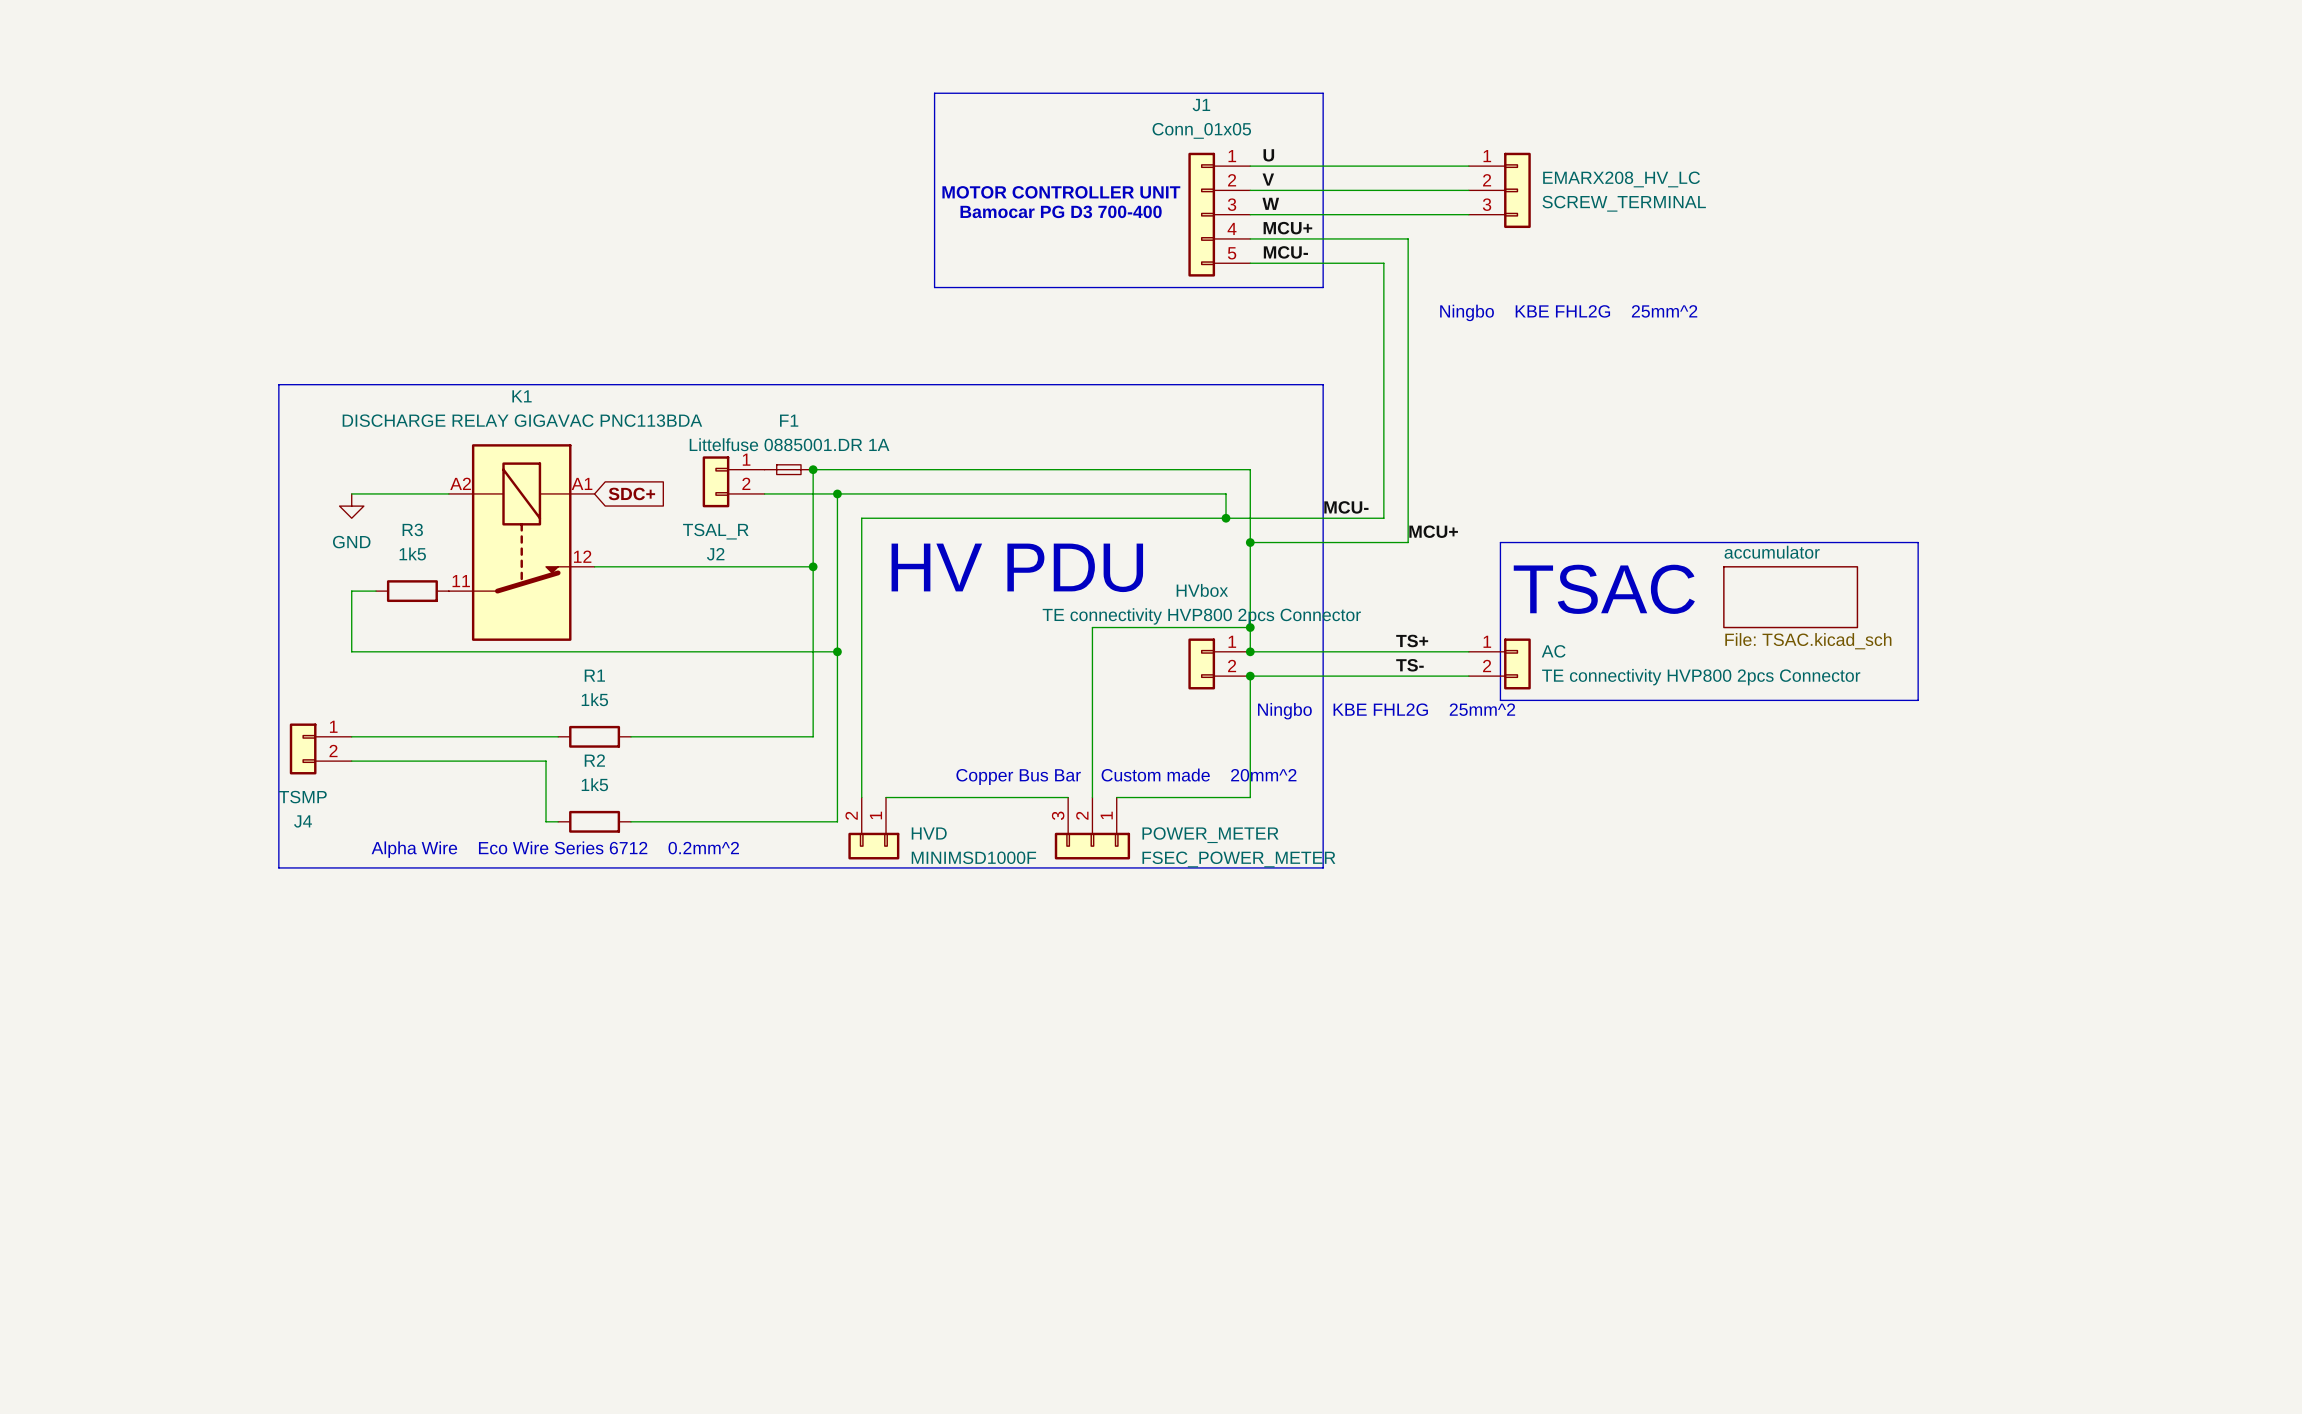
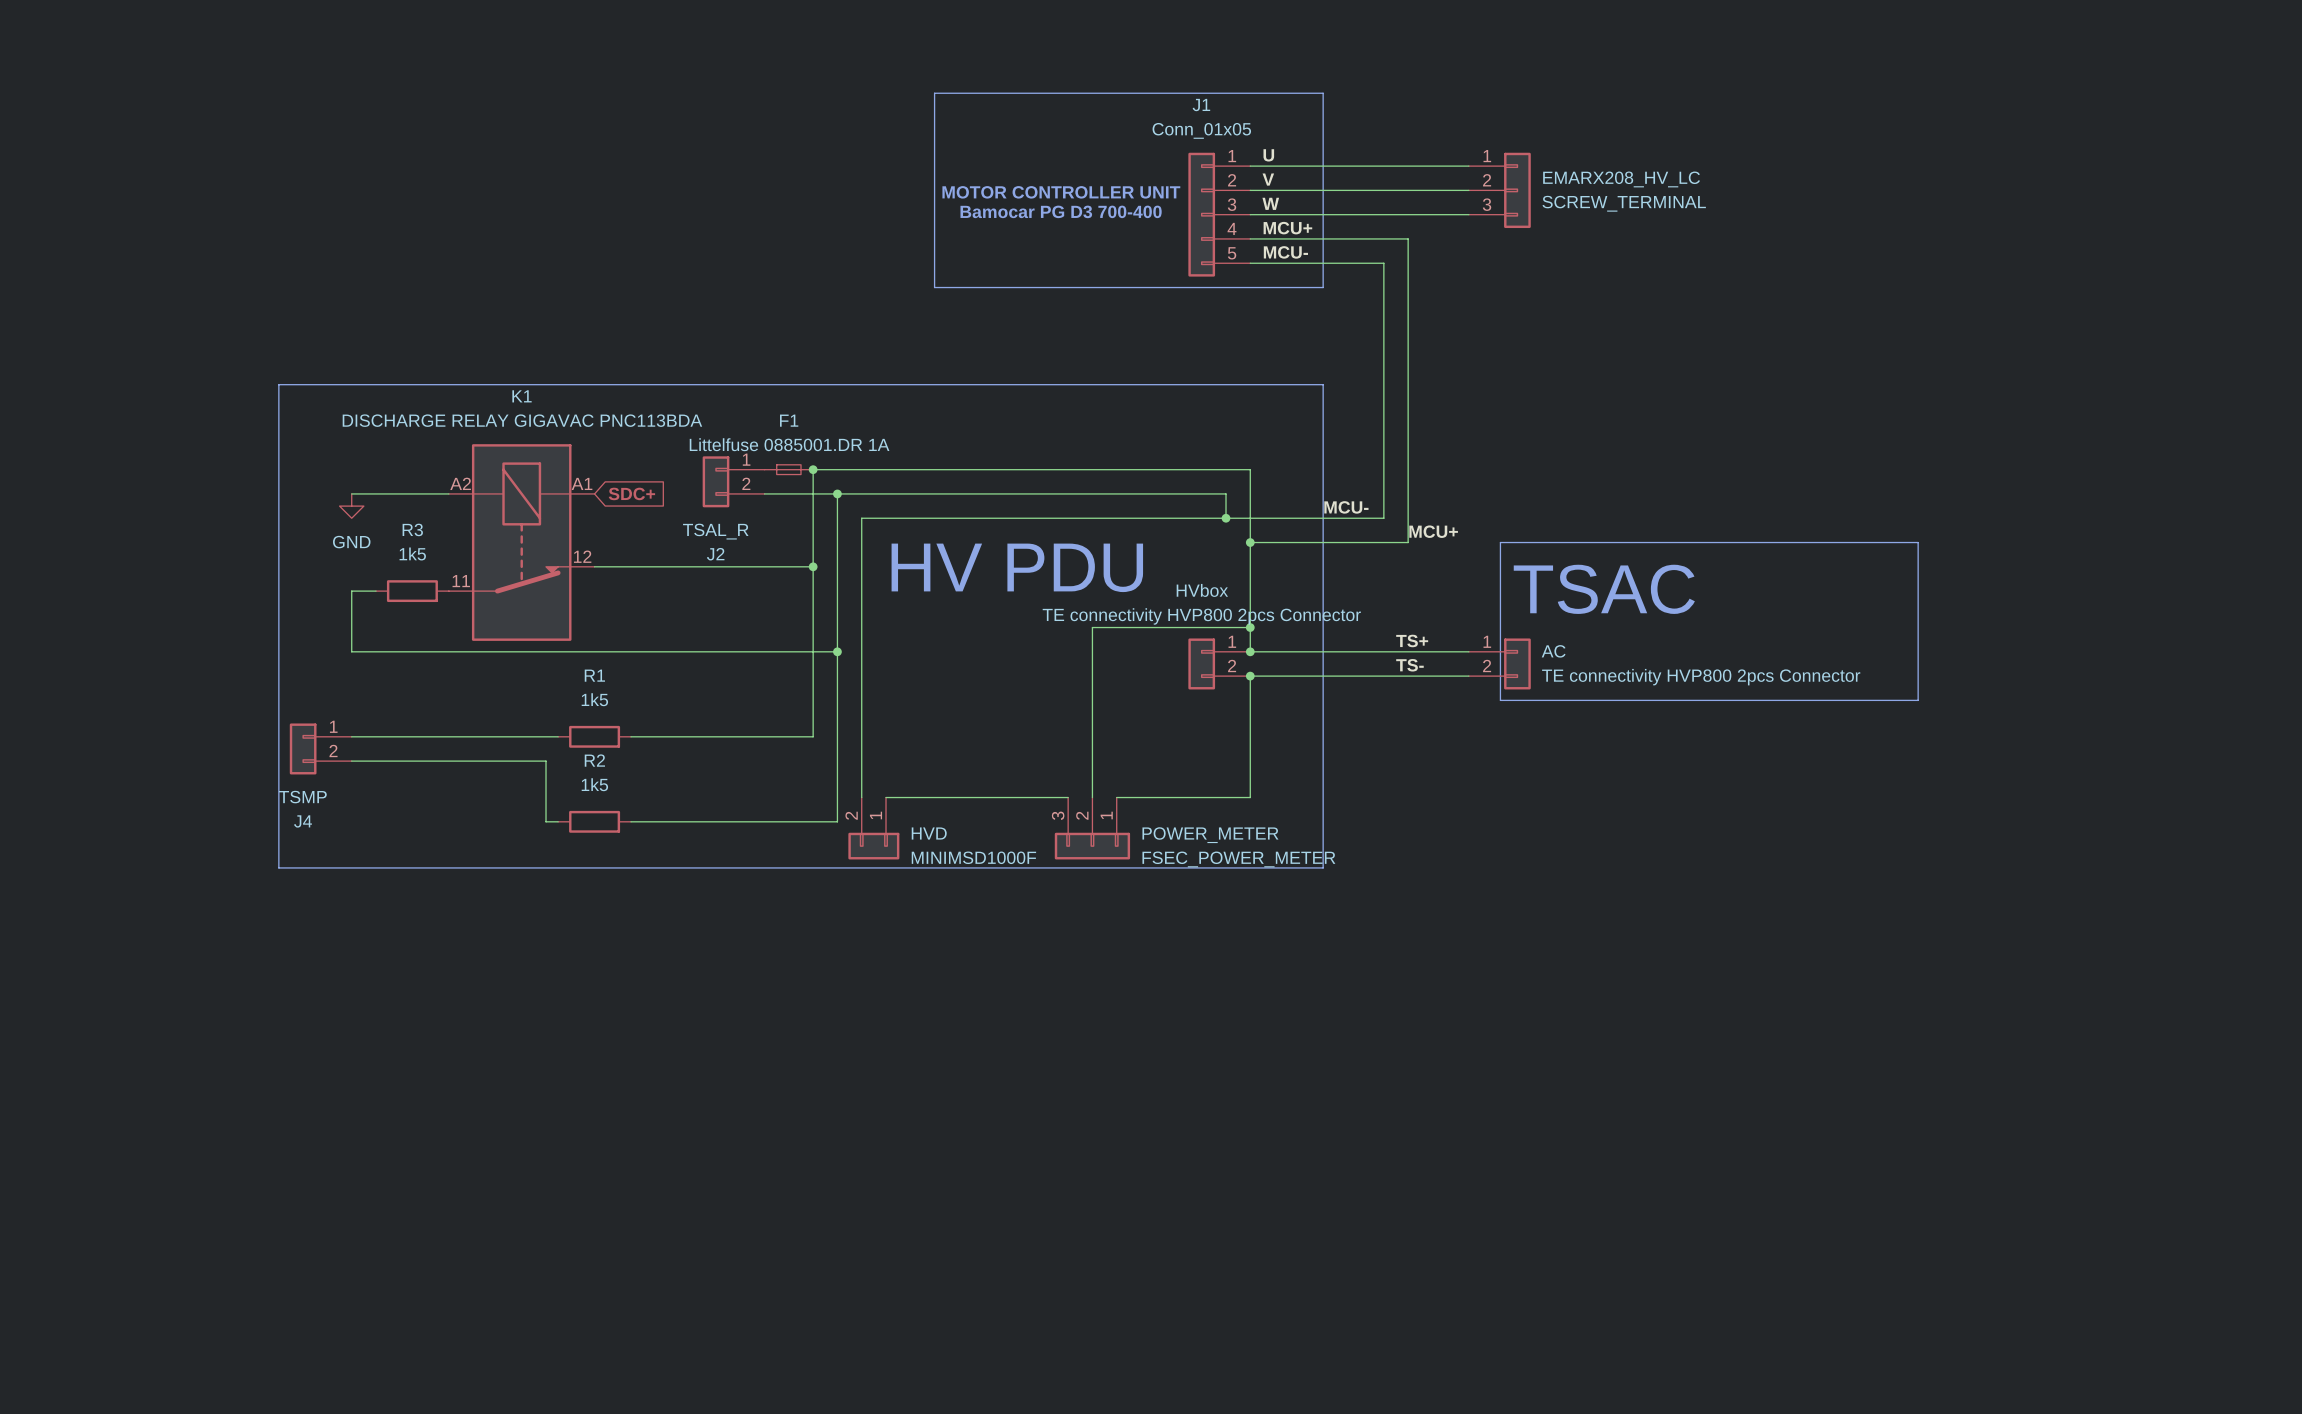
text: Ningbo KBE FHL2G 25mm^2 (1568, 312) -> none
sheet accumulator: File: TSAC.kicad_sch (1790, 597) -> none
text: Ningbo KBE FHL2G 25mm^2 (1386, 711) -> none
text: Copper Bus Bar Custom made 20mm^2 (1126, 776) -> none
text: Alpha Wire Eco Wire Series 6712 0.2mm^2 (555, 849) -> none

